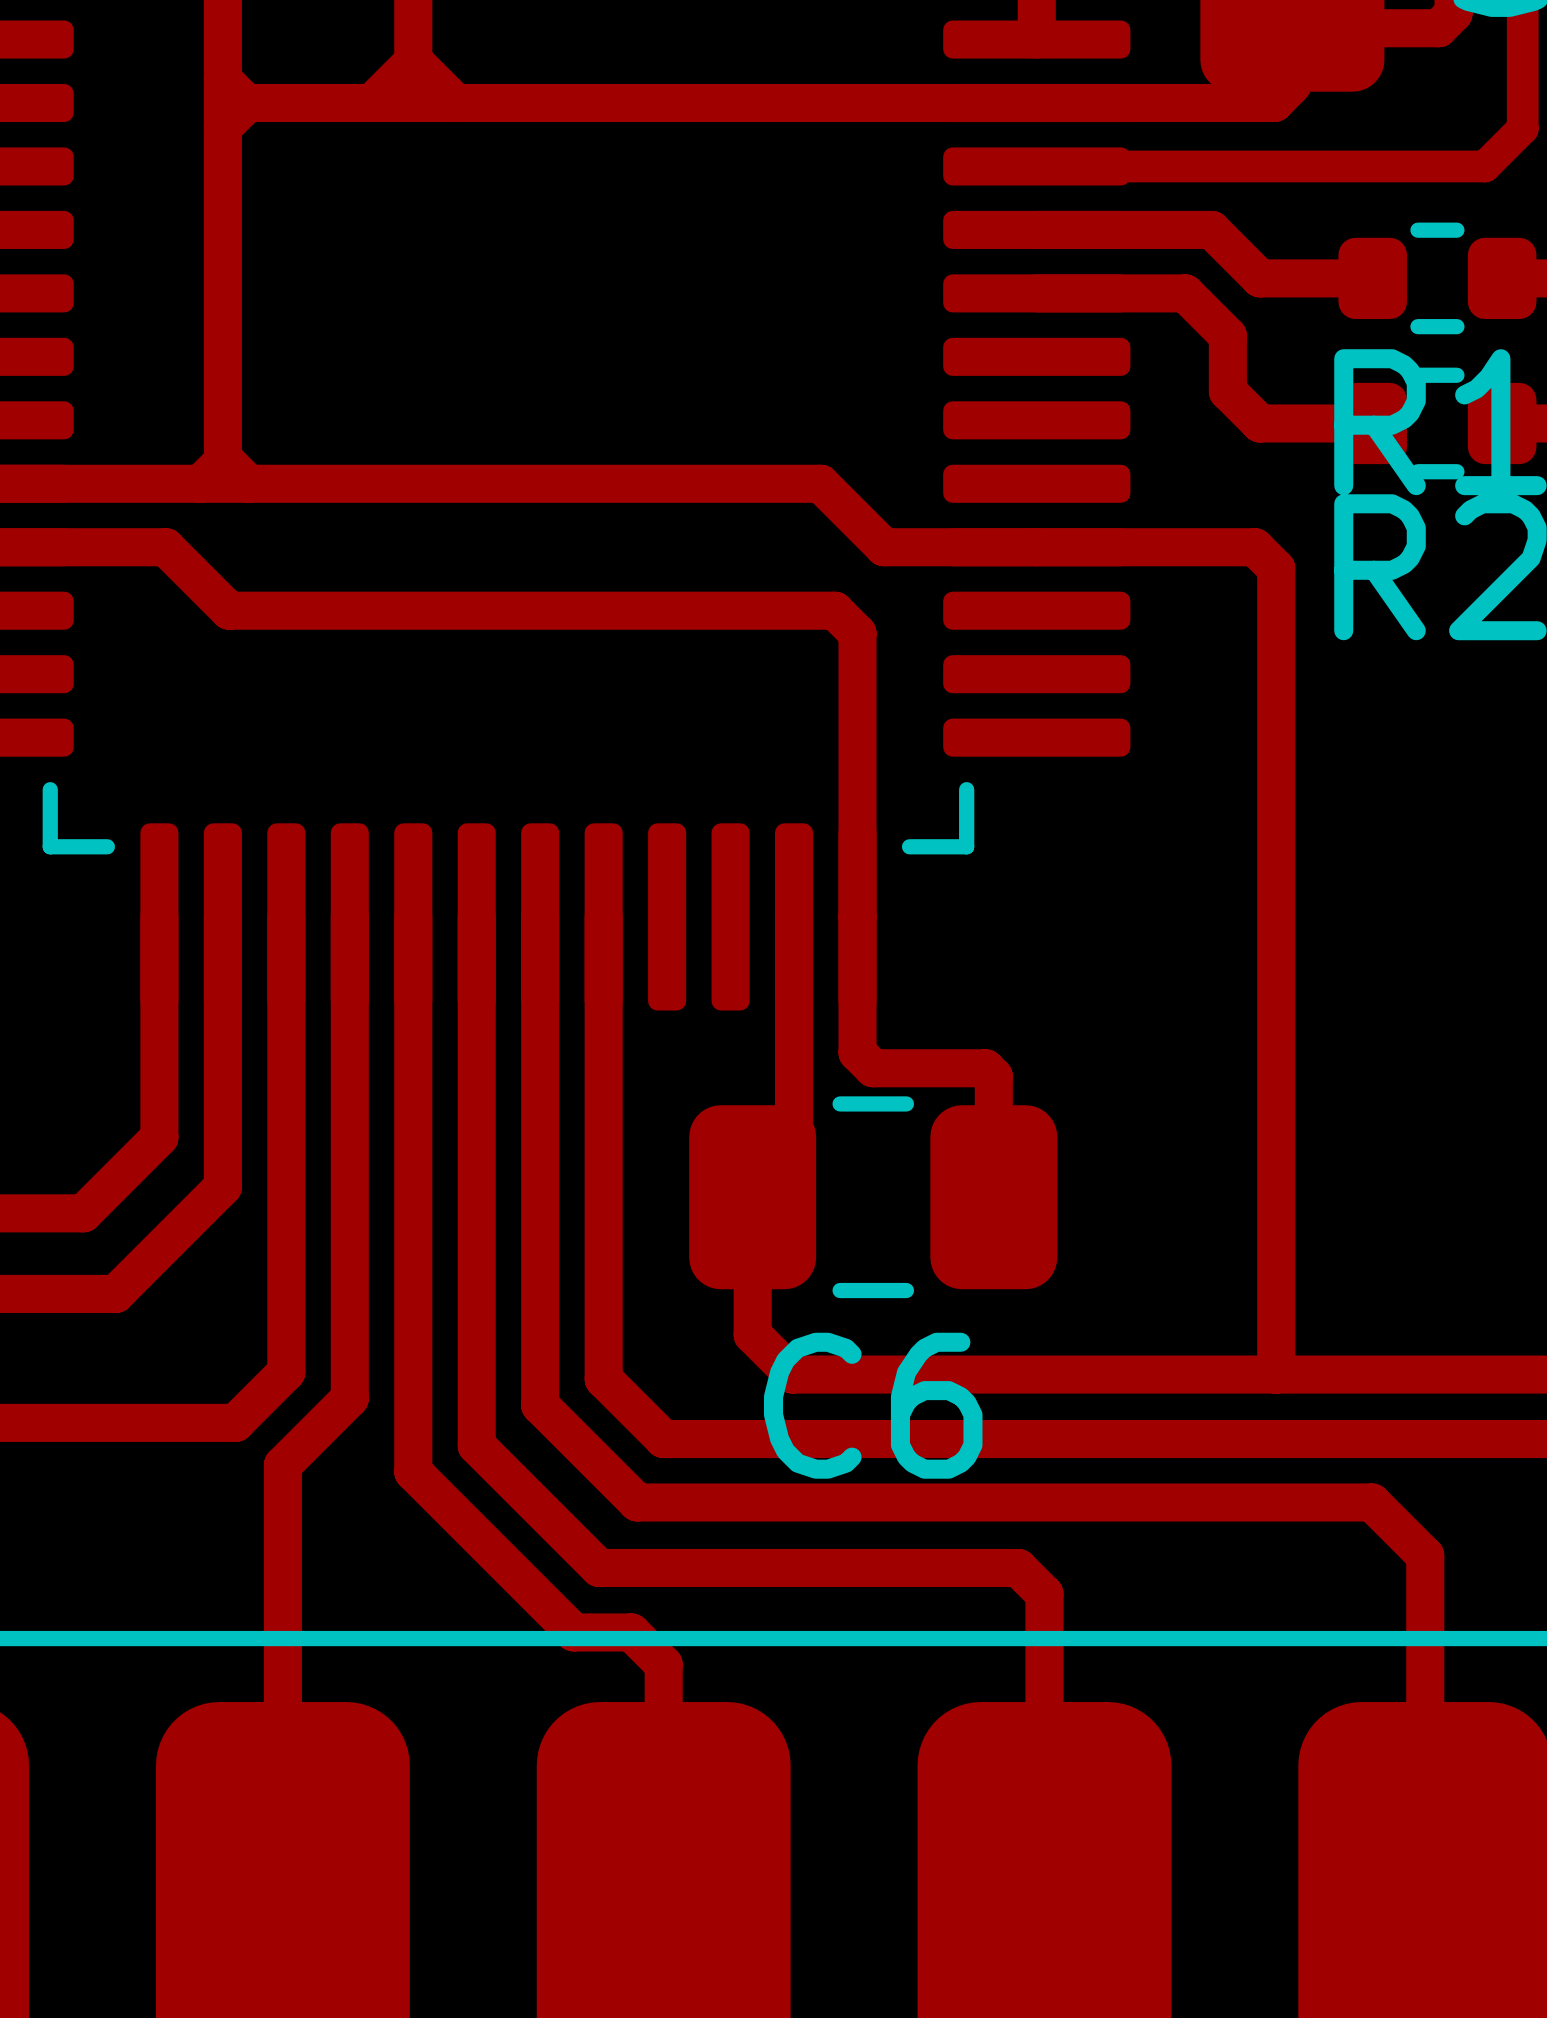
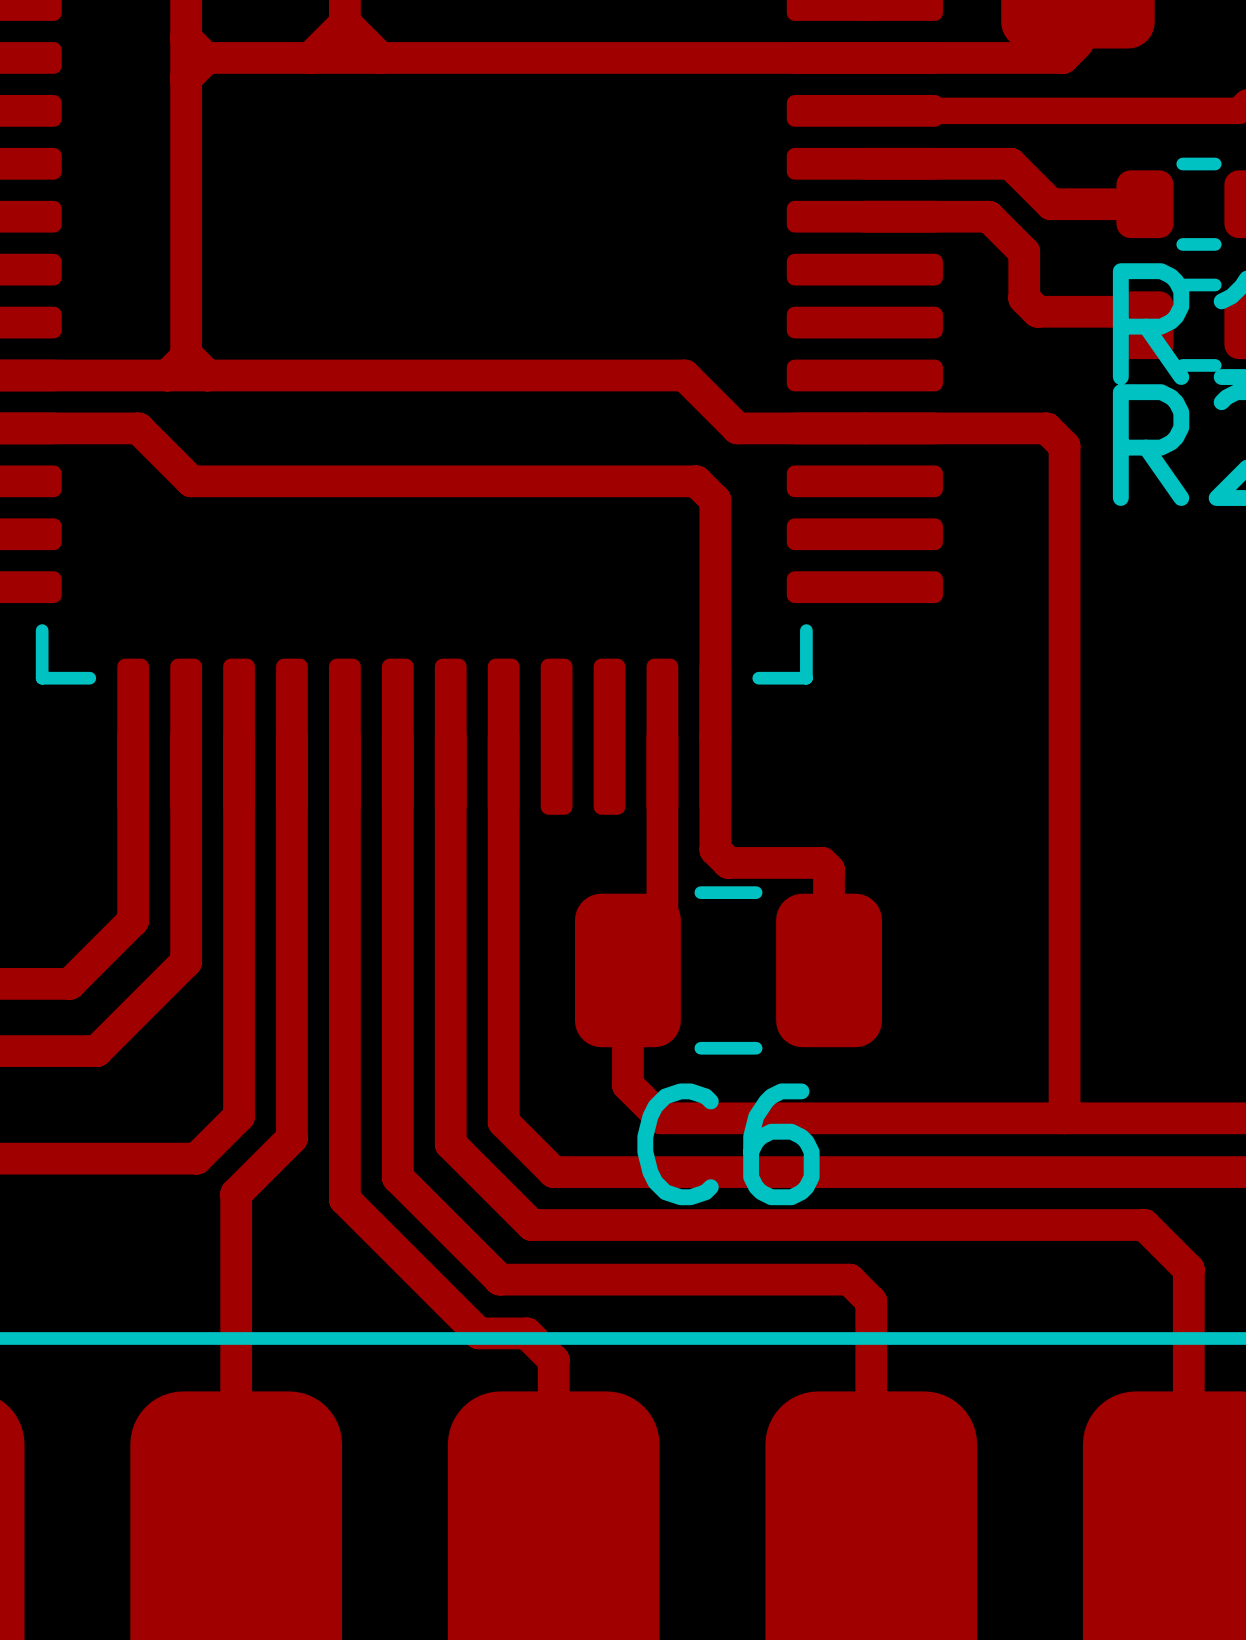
track: (1244, 407) (1260, 423) (1372, 423) -> (1037, 311) (1144, 311)

